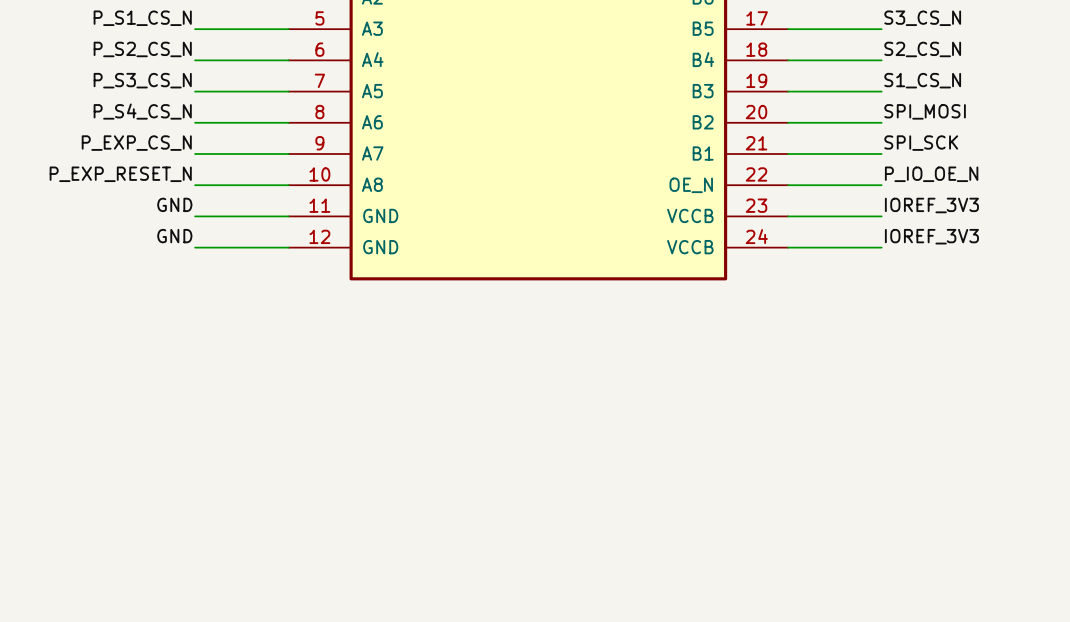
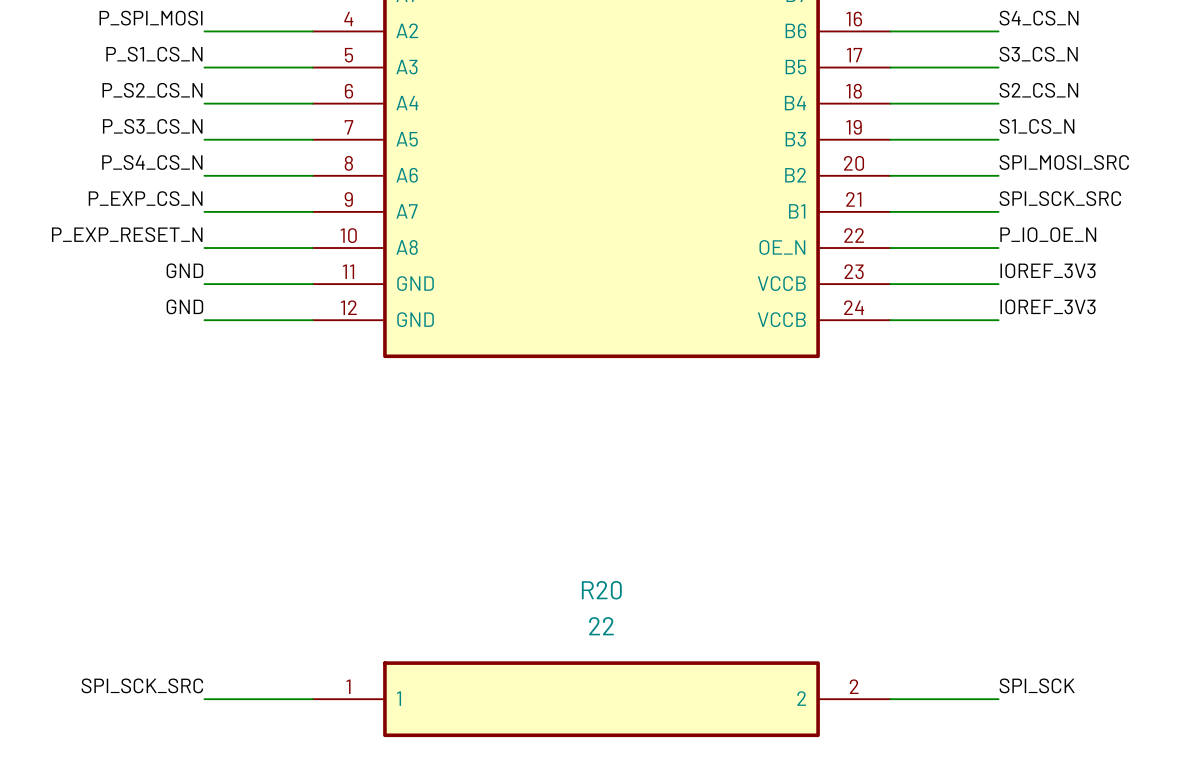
label: SPI_MOSI (925, 111) -> SPI_MOSI_SRC (1064, 162)
label: SPI_SCK (921, 143) -> SPI_SCK_SRC (1060, 198)
label: none -> SPI_SCK_SRC (142, 685)
label: none -> SPI_SCK (1037, 685)
wire: none -> (204, 699) (312, 699)
R20: none -> 22 (601, 699)
wire: none -> (890, 699) (998, 699)

